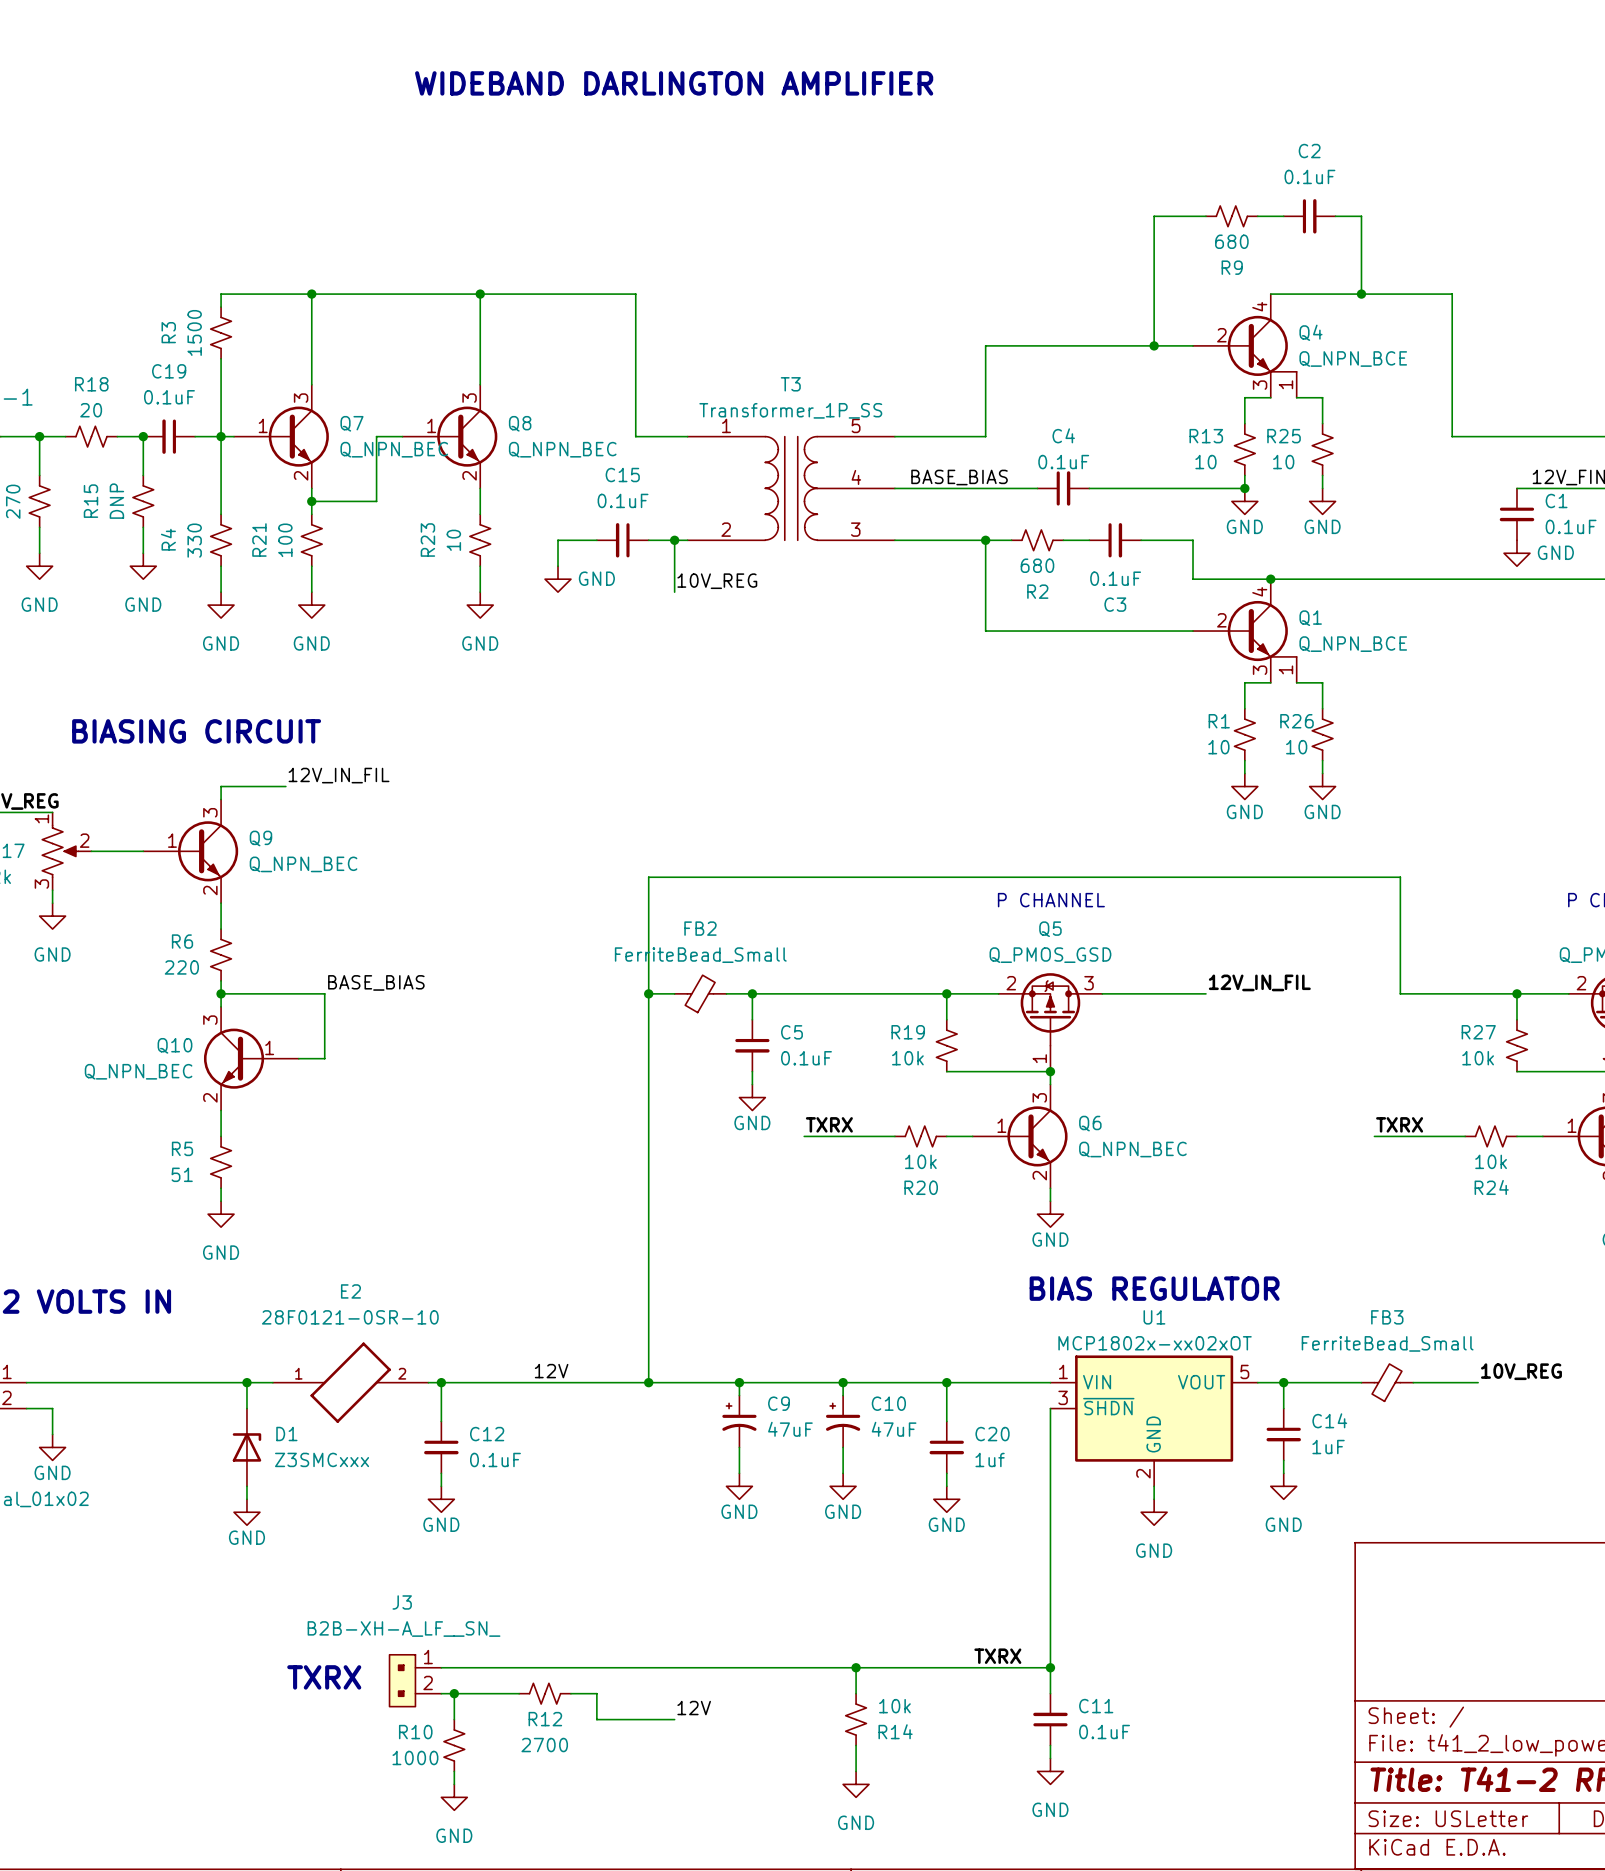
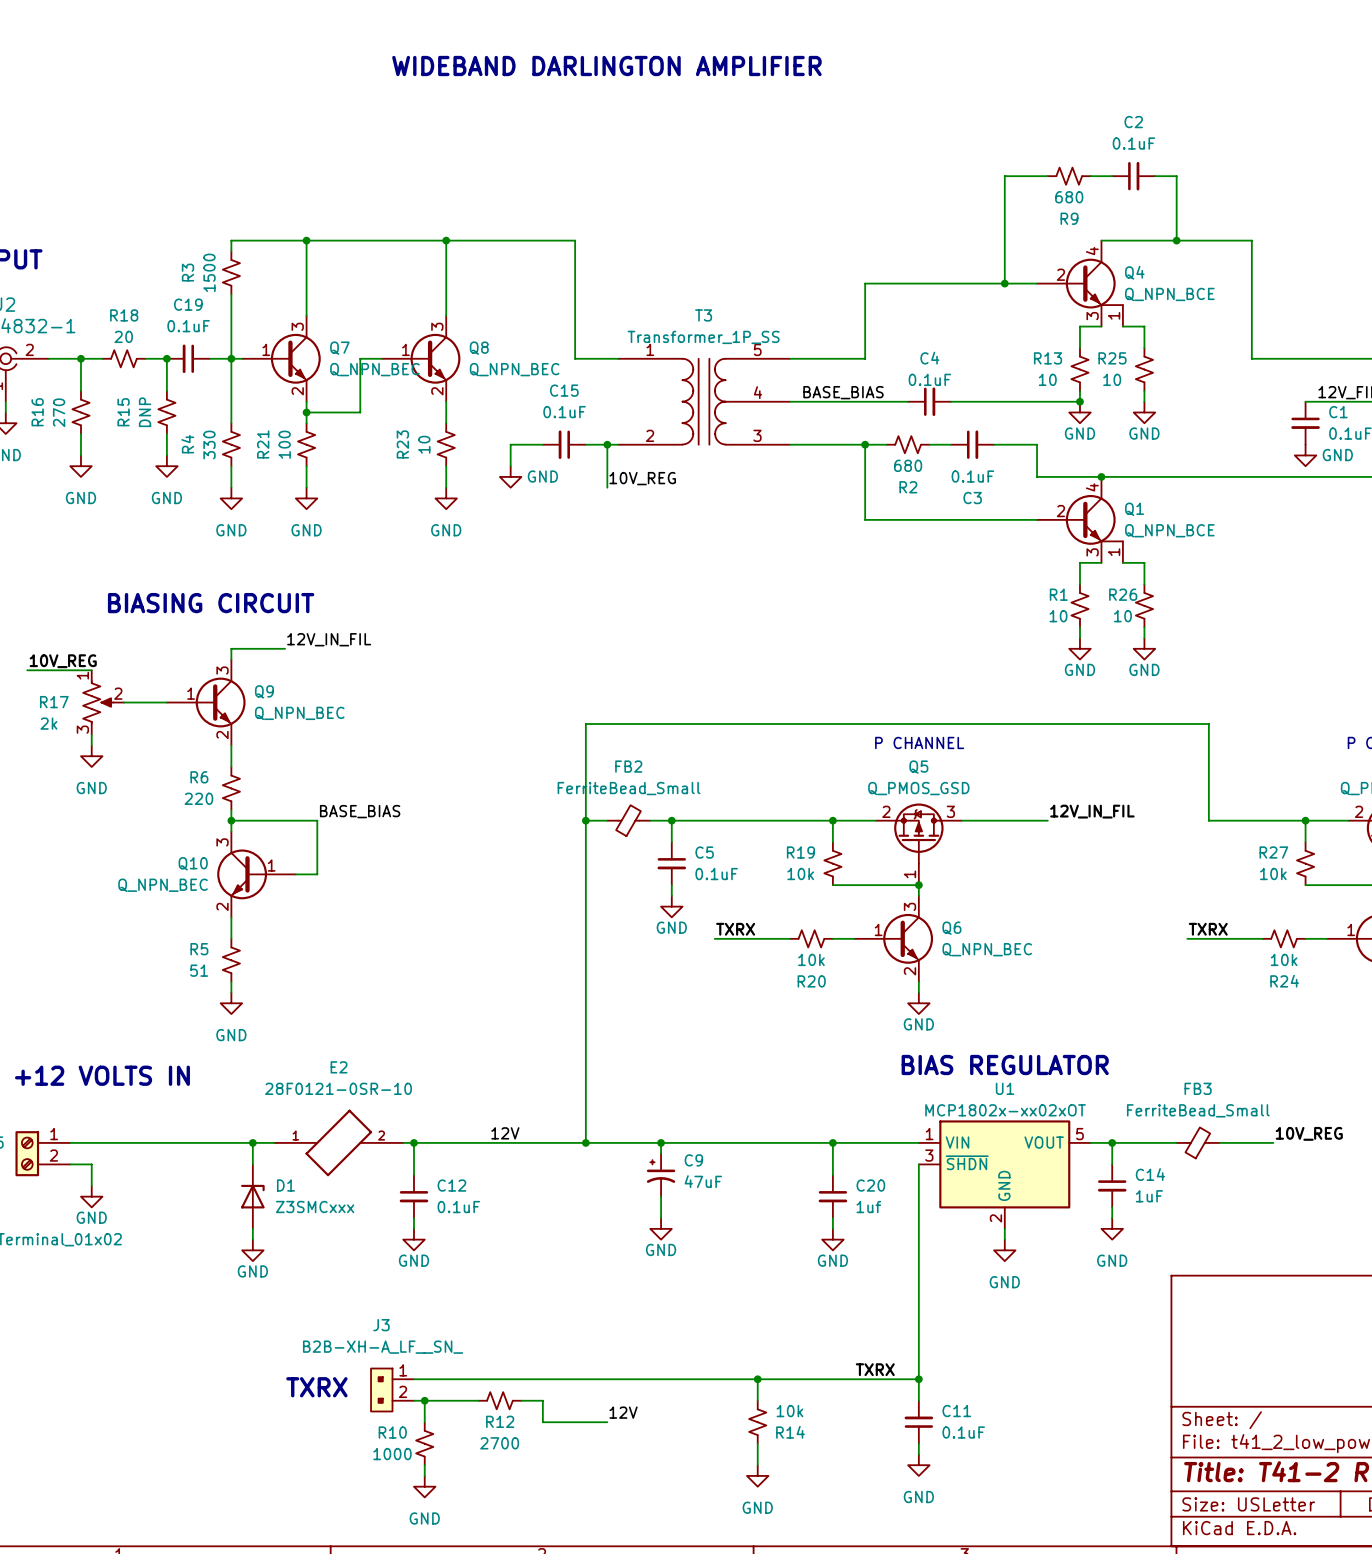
wire: (843, 1382) (843, 1395) -> none
junction: (843, 1382) -> none
C10: 47uF (843, 1421) -> none
wire: (843, 1447) (843, 1473) -> none
power symbol: GND (843, 1486) -> none

